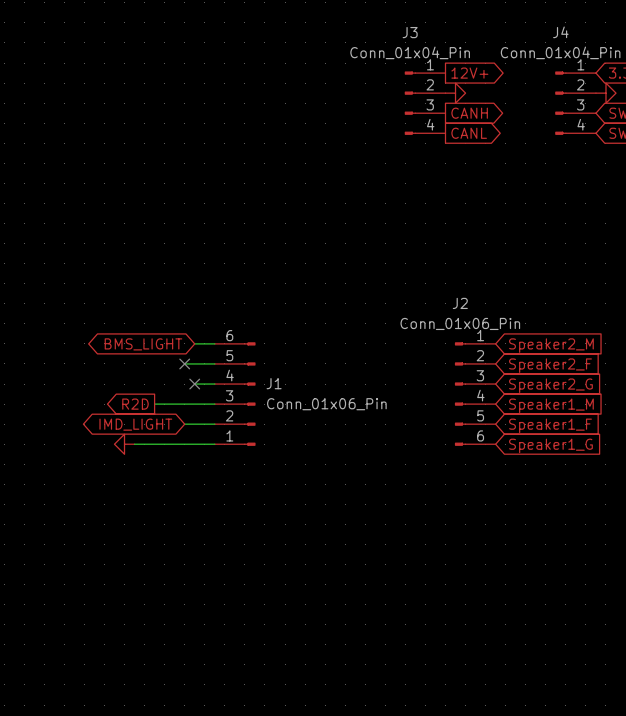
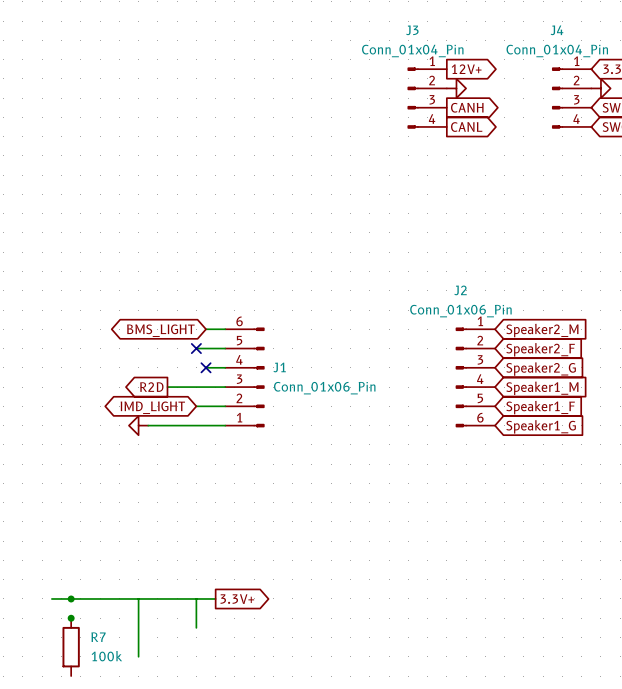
wire: none -> (51, 598) (215, 598)
junction: none -> (71, 598)
wire: none -> (138, 598) (138, 656)
wire: none -> (196, 598) (196, 627)
global label: none -> 3.3V+ (237, 599)
junction: none -> (71, 618)
R7: none -> 100k (71, 647)

